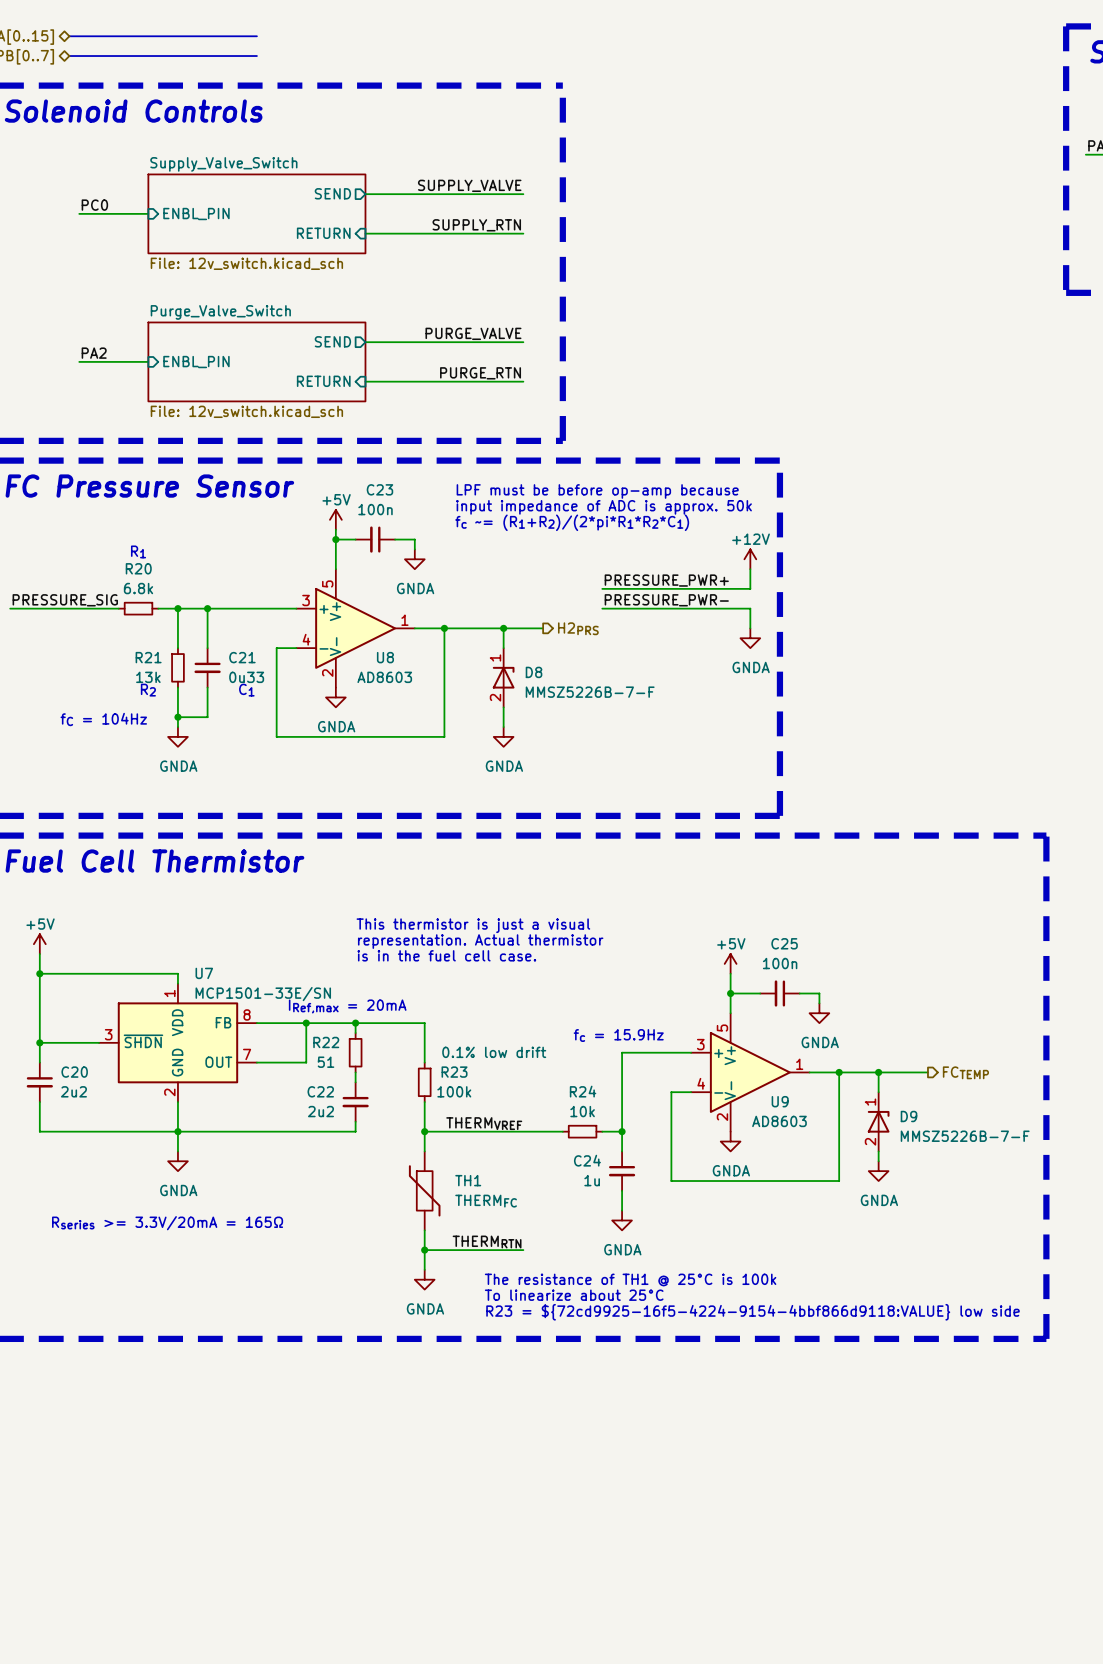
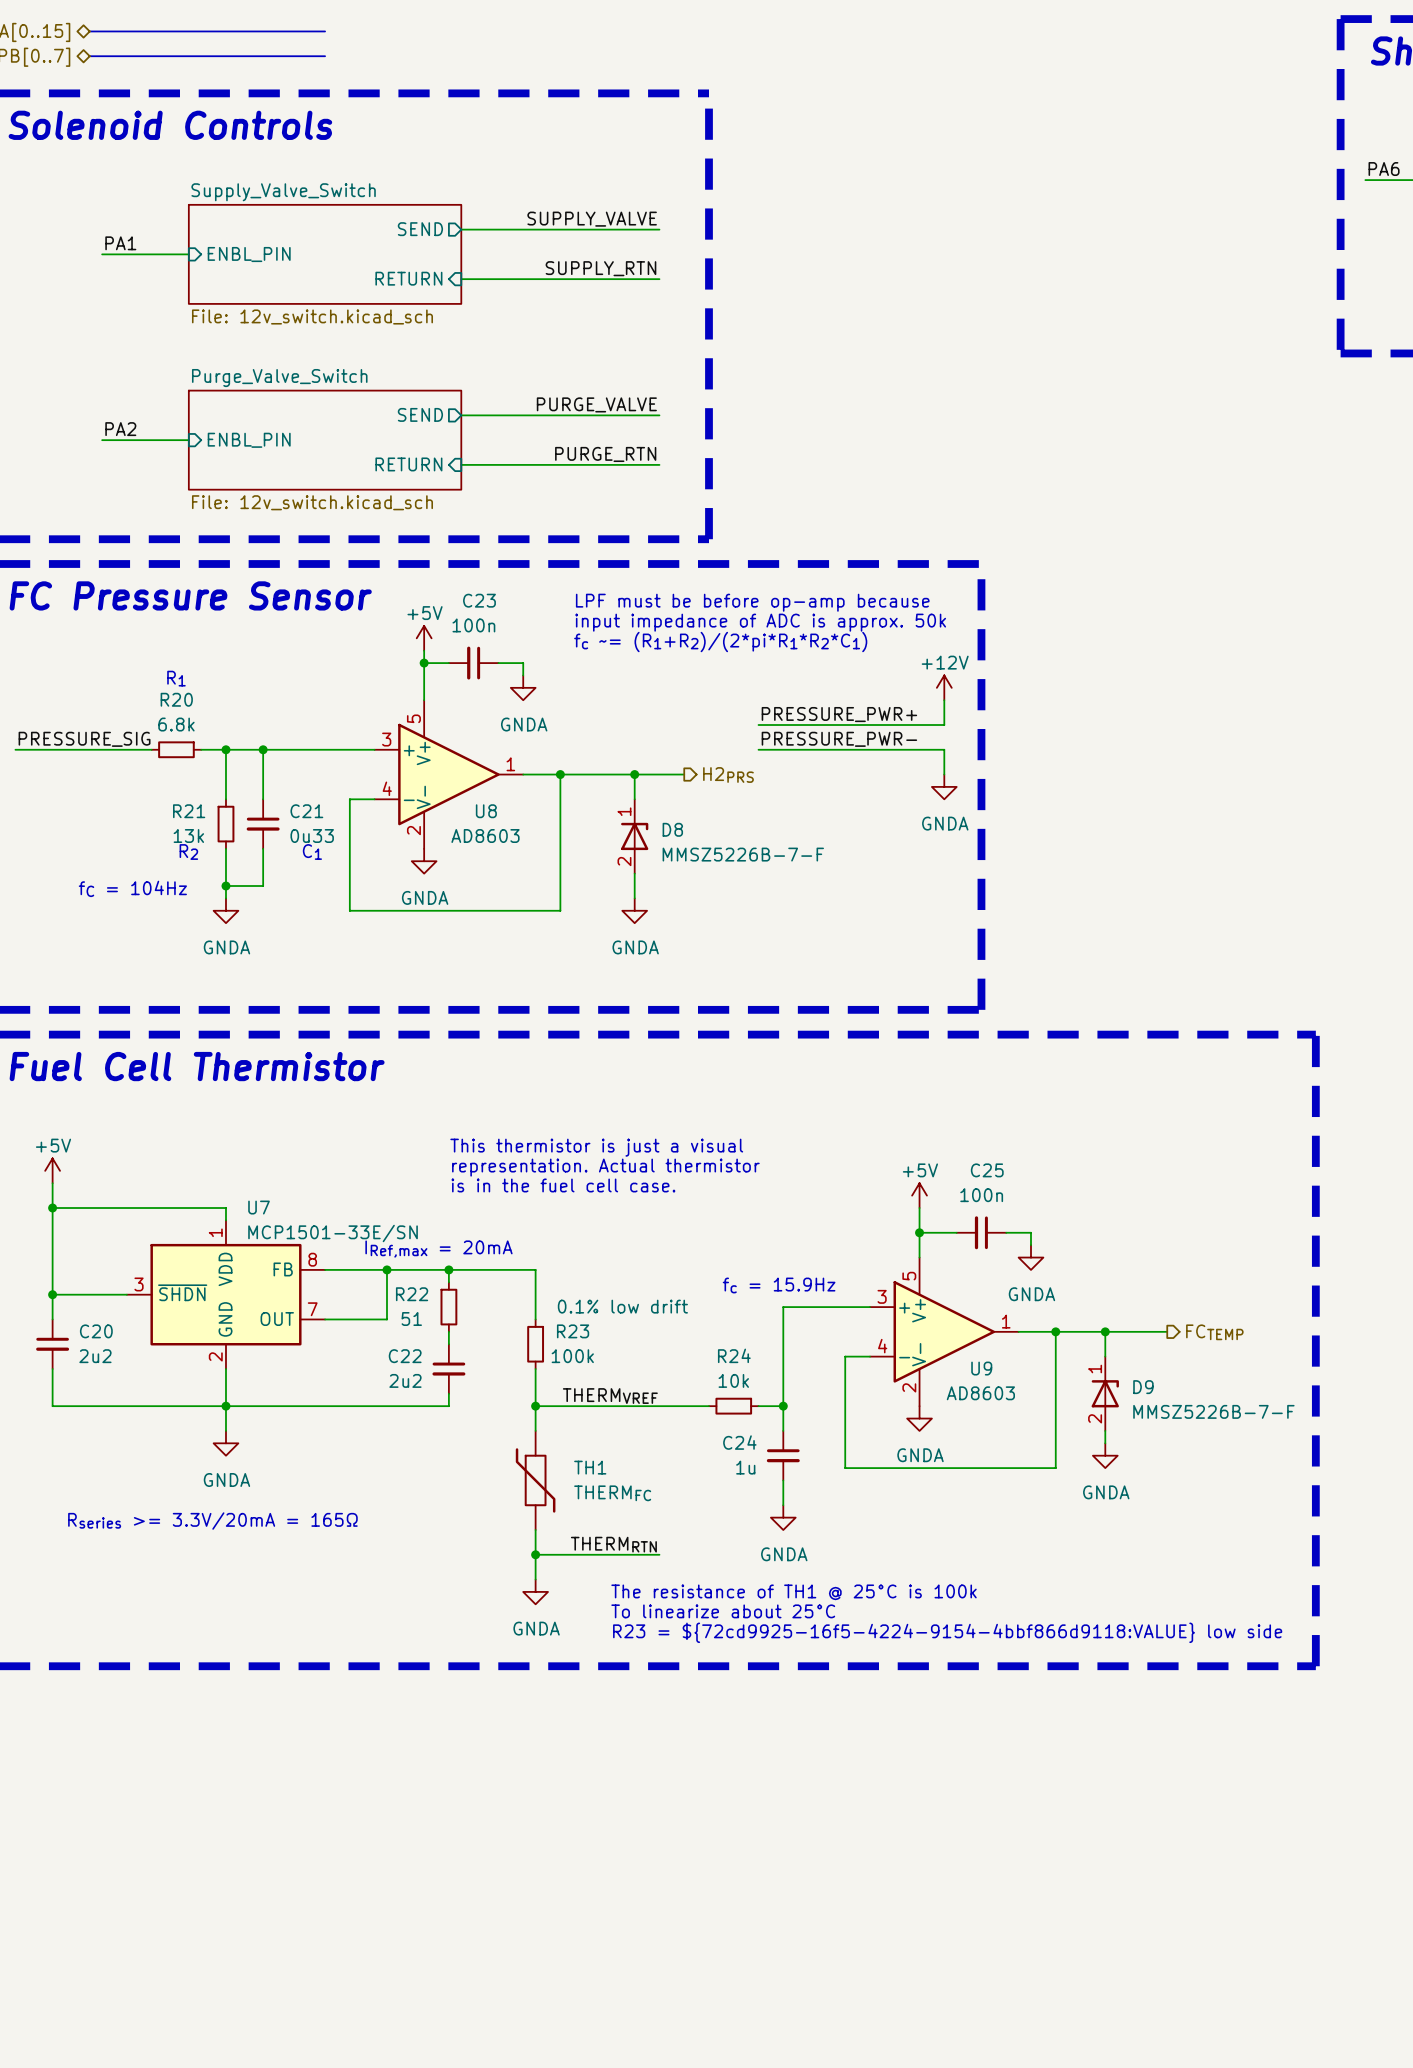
label: PC0 (94, 205) -> PA1 (120, 243)

